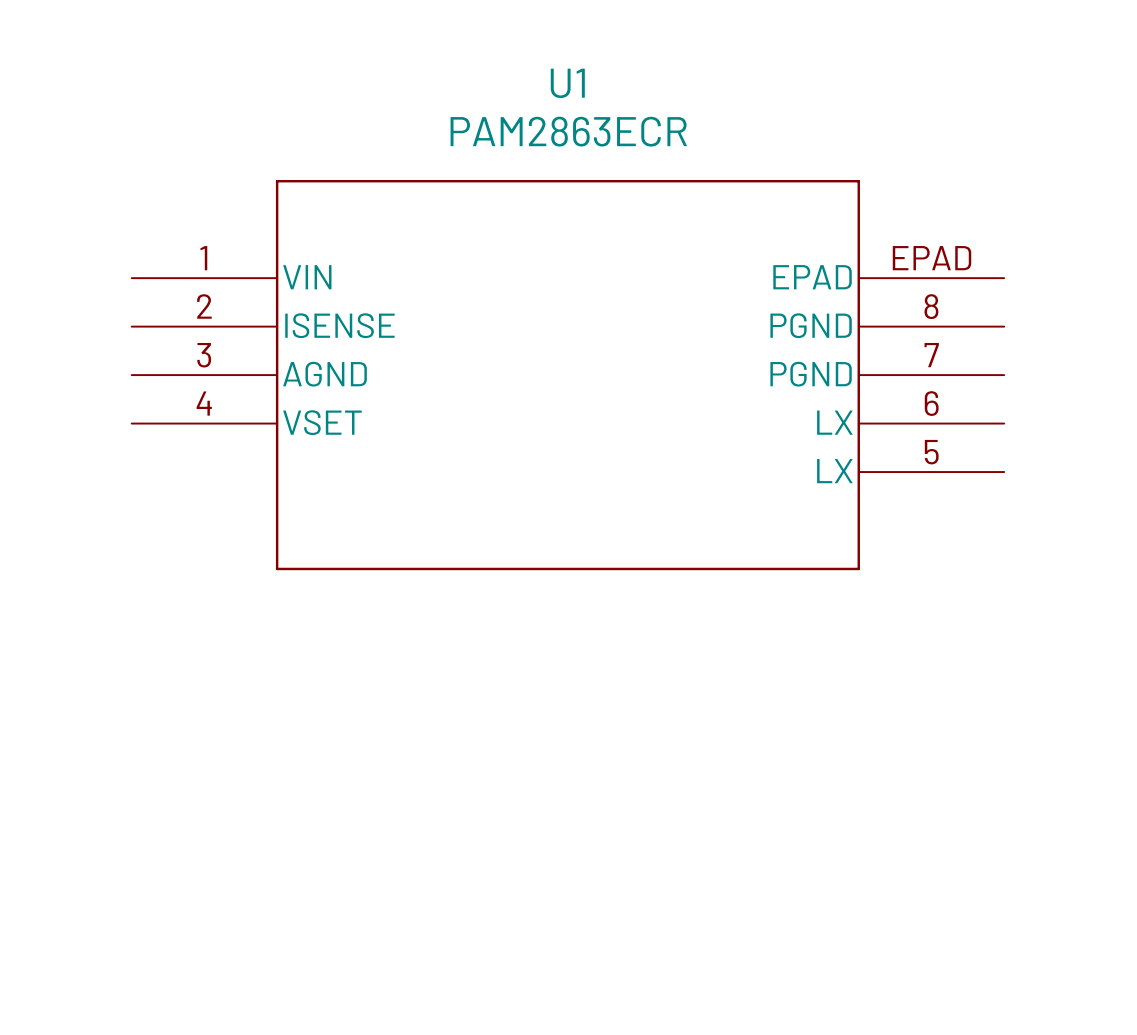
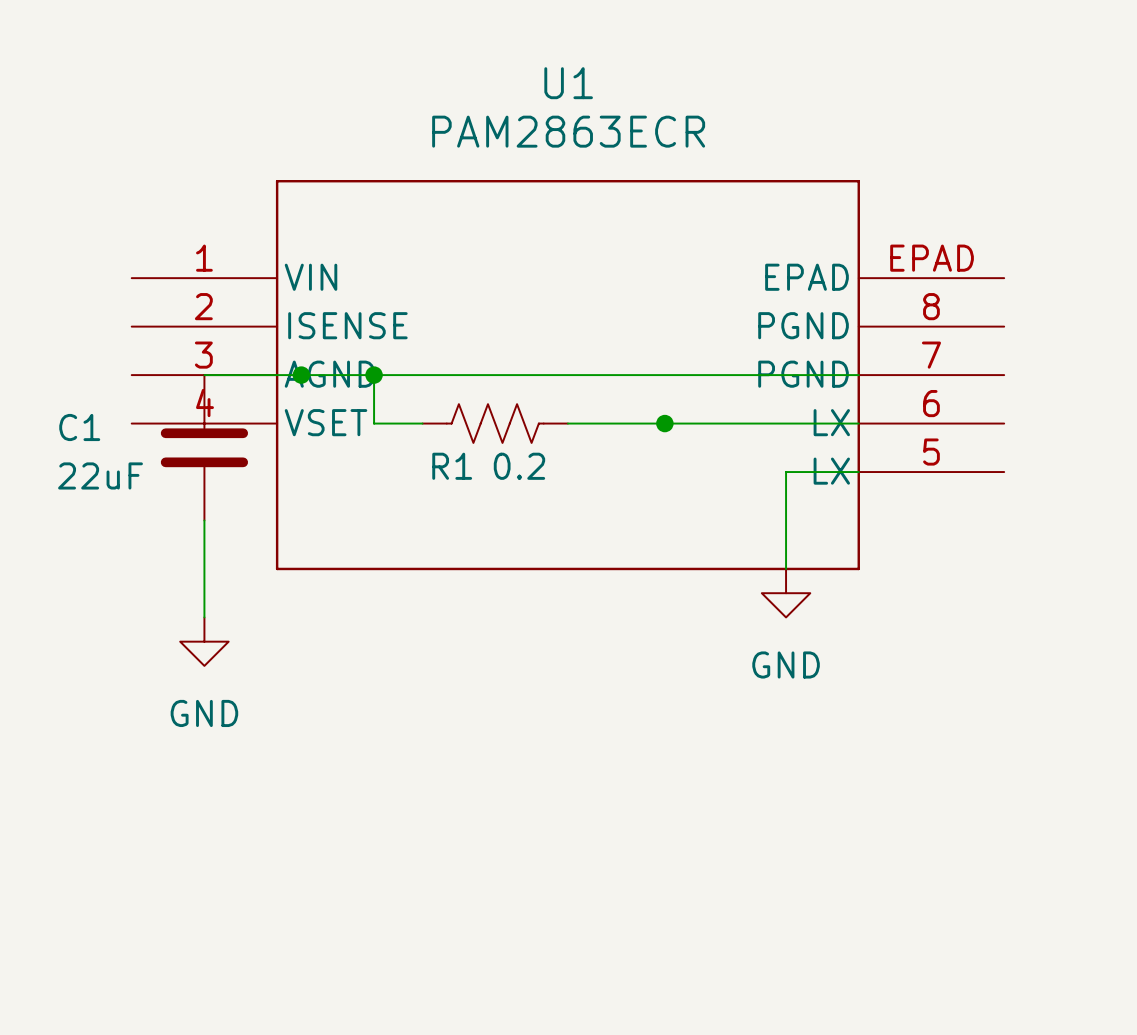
wire: none -> (204, 375) (858, 375)
junction: none -> (301, 375)
wire: none -> (374, 375) (374, 423) (422, 423)
junction: none -> (374, 375)
R1: none -> 0.2 (495, 423)
wire: none -> (567, 423) (858, 423)
junction: none -> (664, 423)
C1: none -> 22uF (204, 447)
wire: none -> (858, 472) (786, 472) (786, 568)
wire: none -> (204, 520) (204, 617)
power symbol: none -> GND (786, 593)
power symbol: none -> GND (204, 641)

